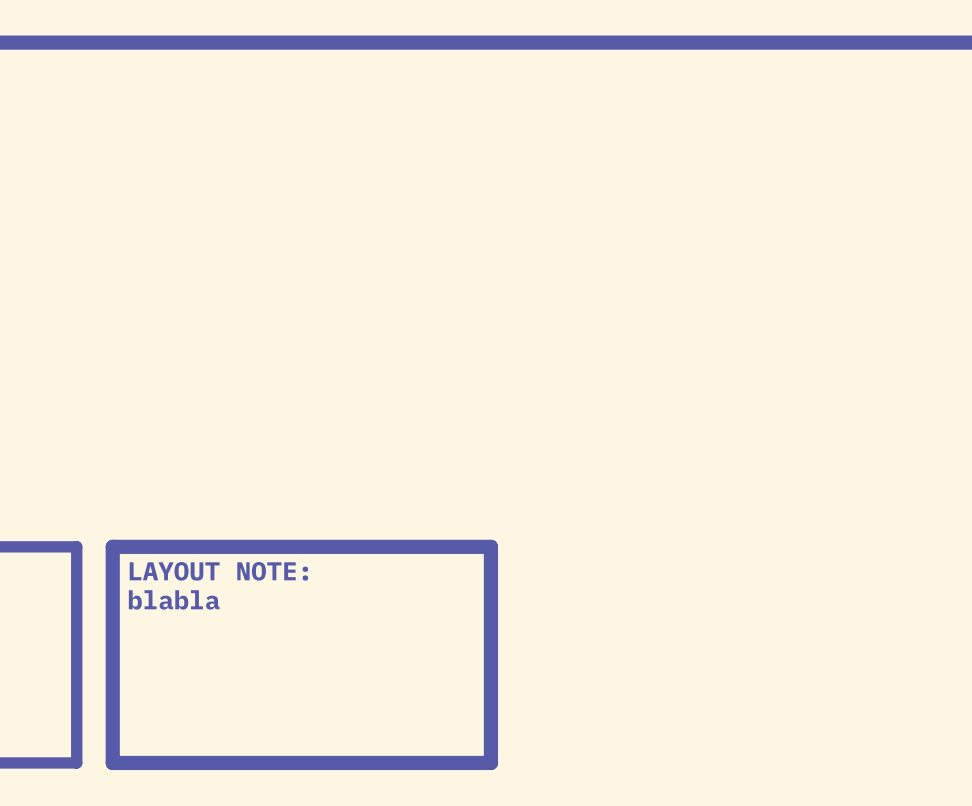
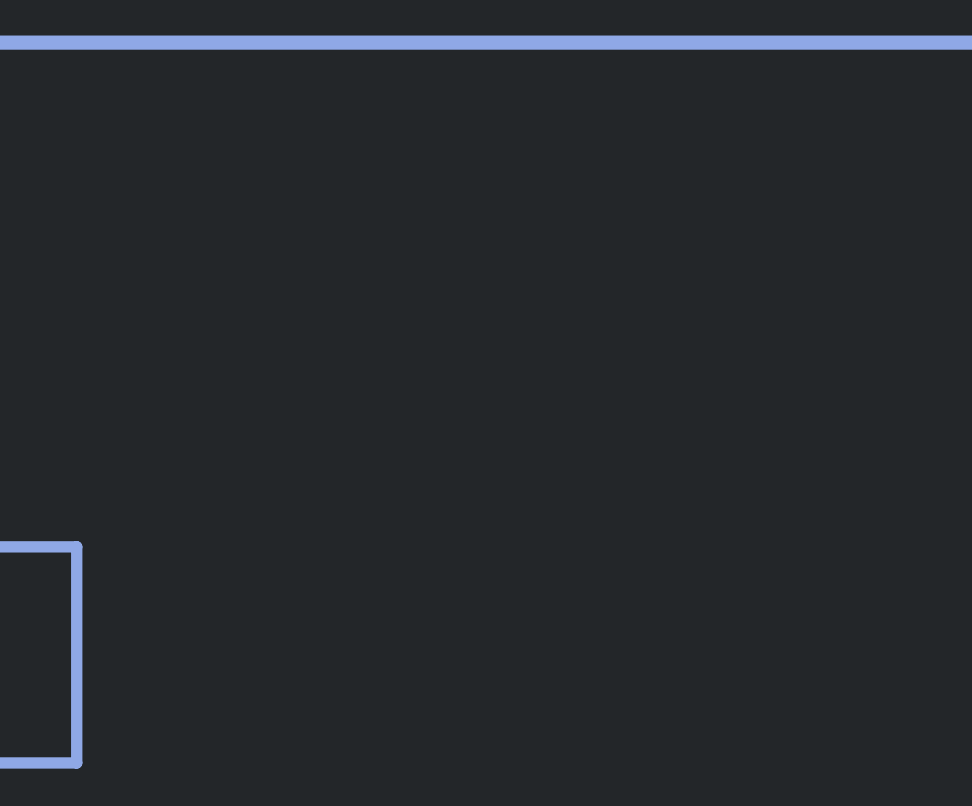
line: (112, 546) (490, 546) (490, 762) (112, 762) (112, 546) -> none
text: LAYOUT NOTE: (218, 571) -> none
text: blabla (174, 599) -> none

